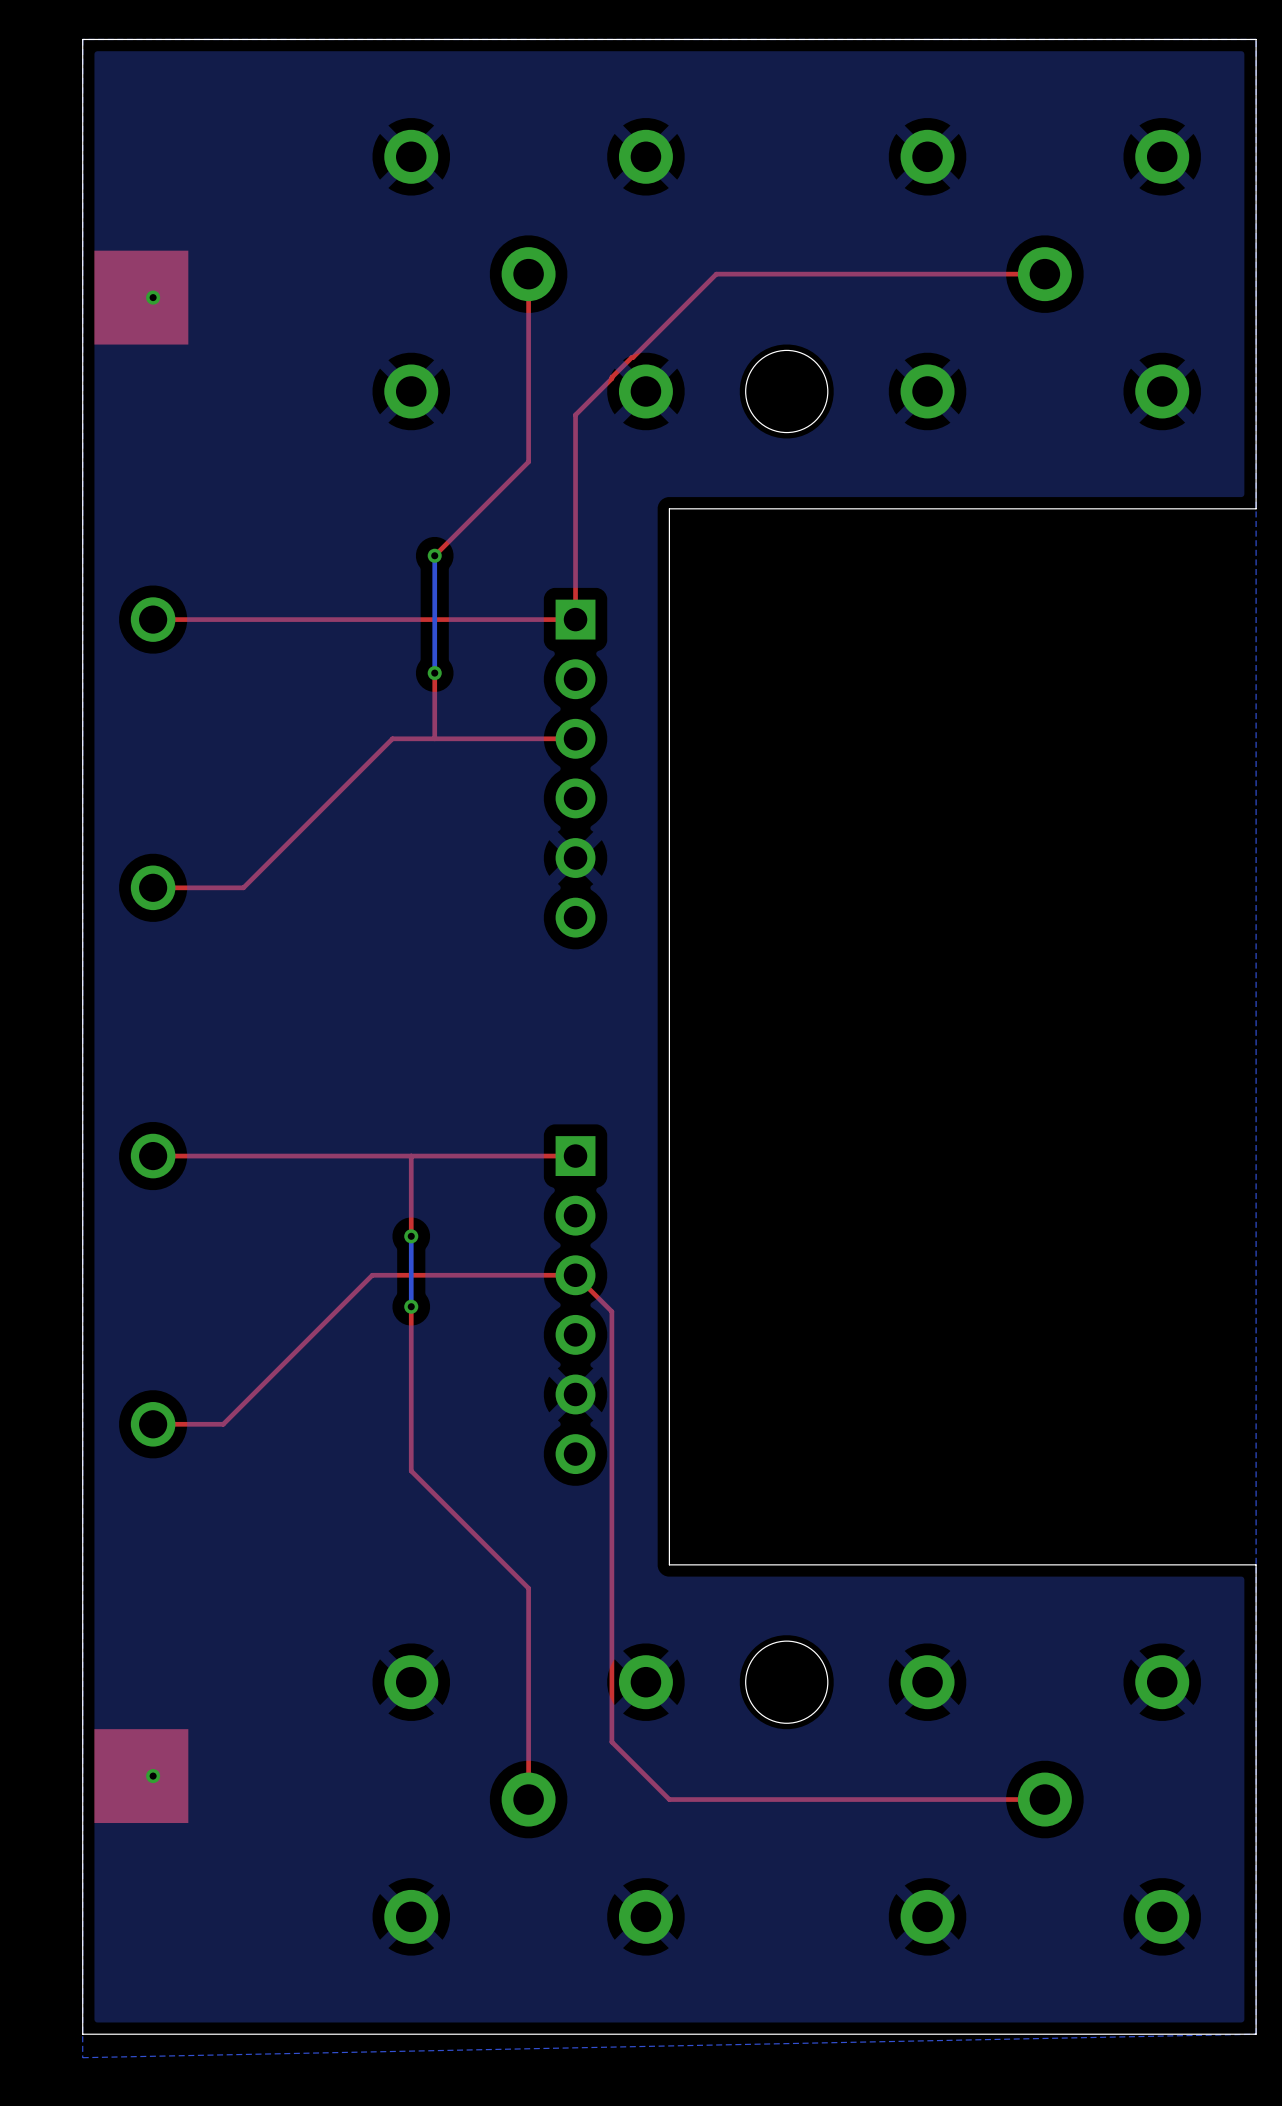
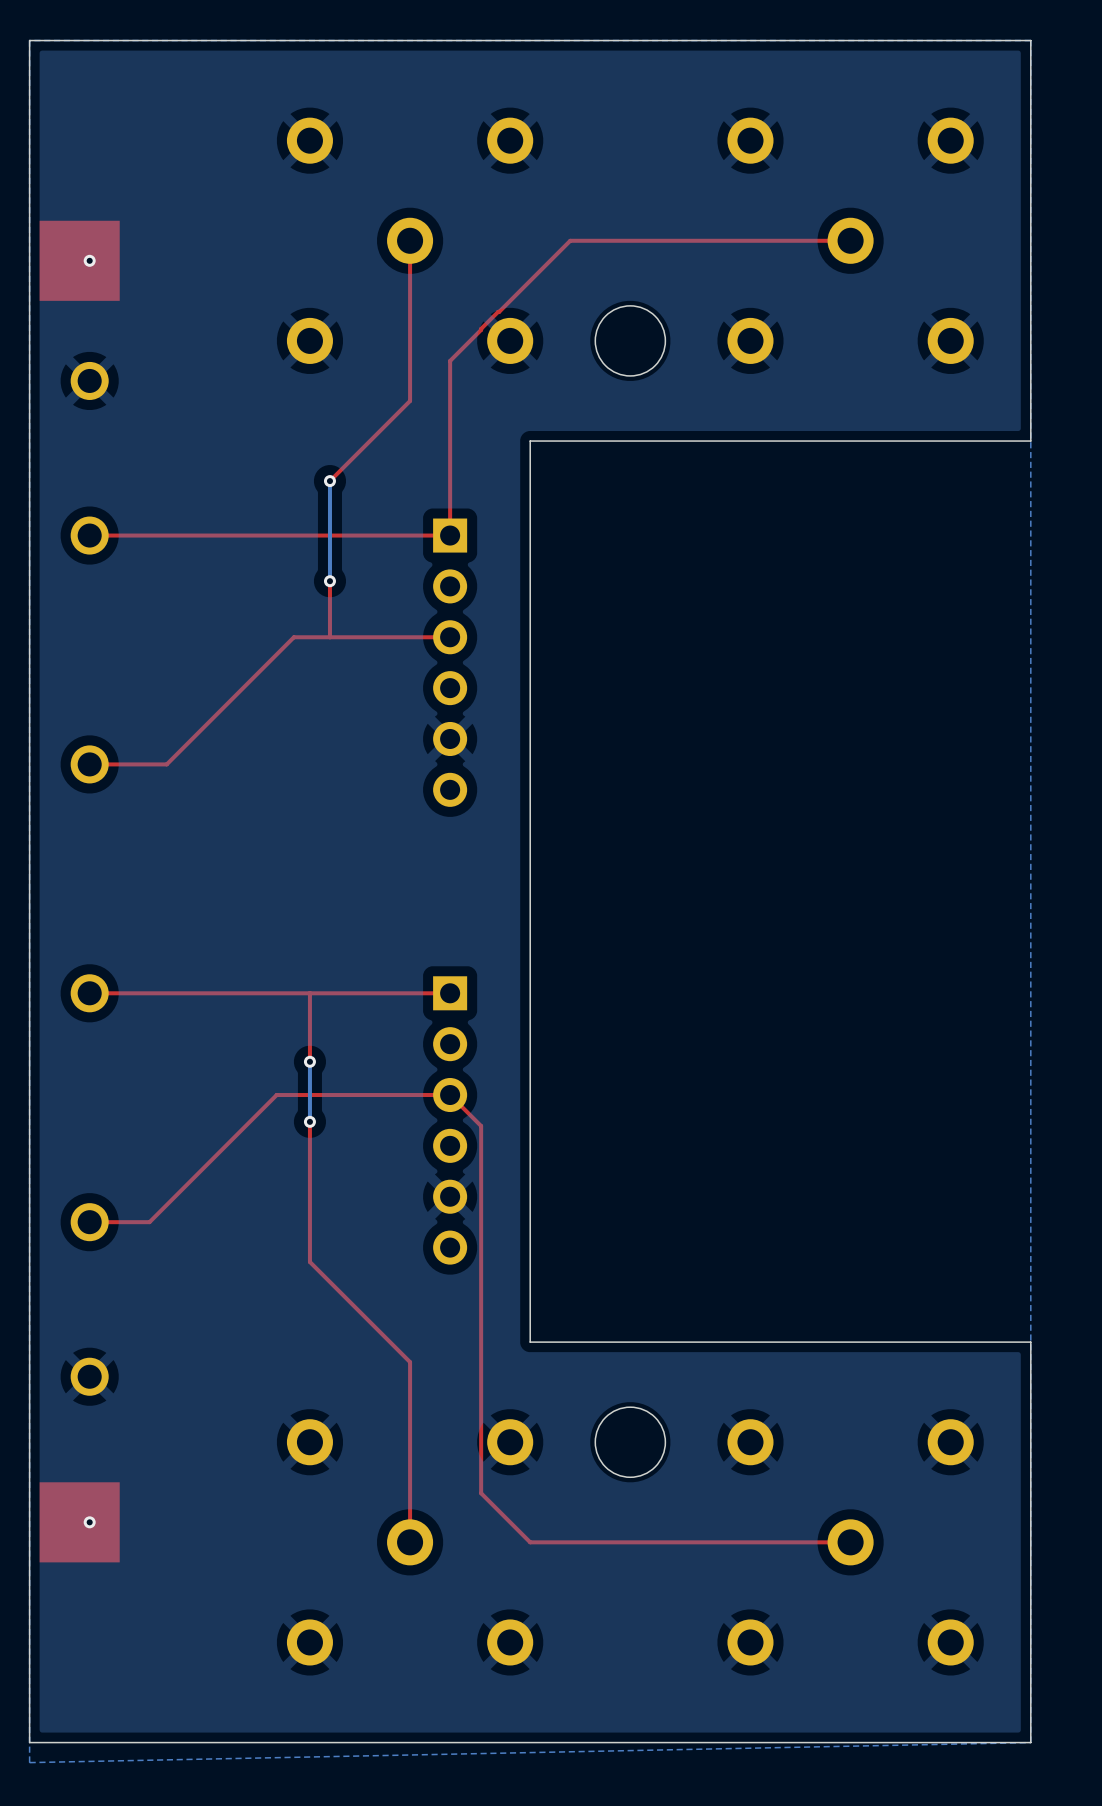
part: none -> (89, 380)
part: none -> (89, 1376)

